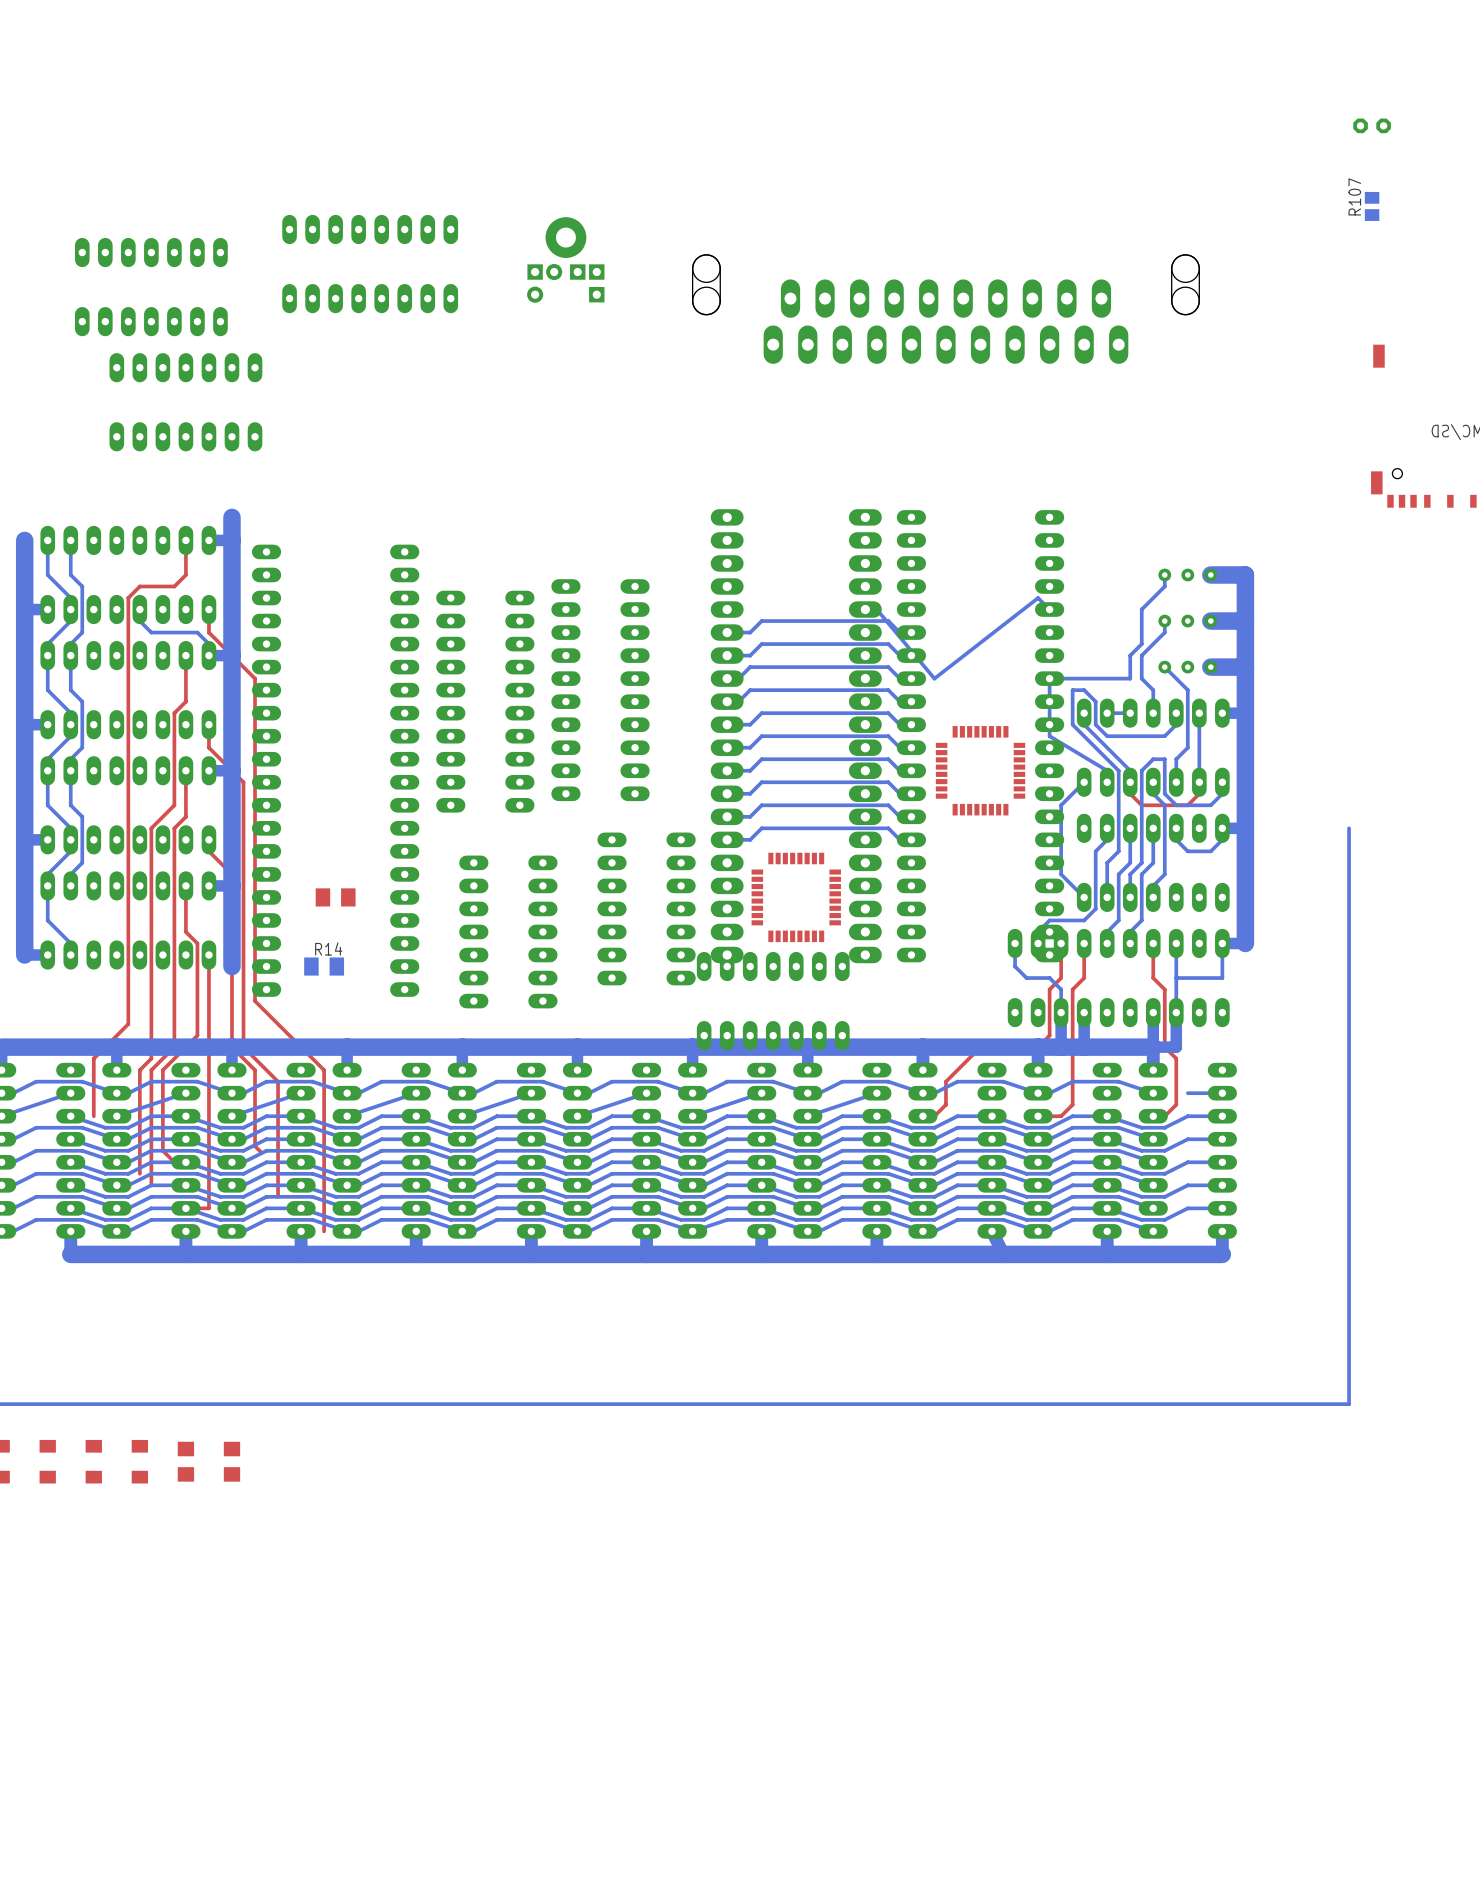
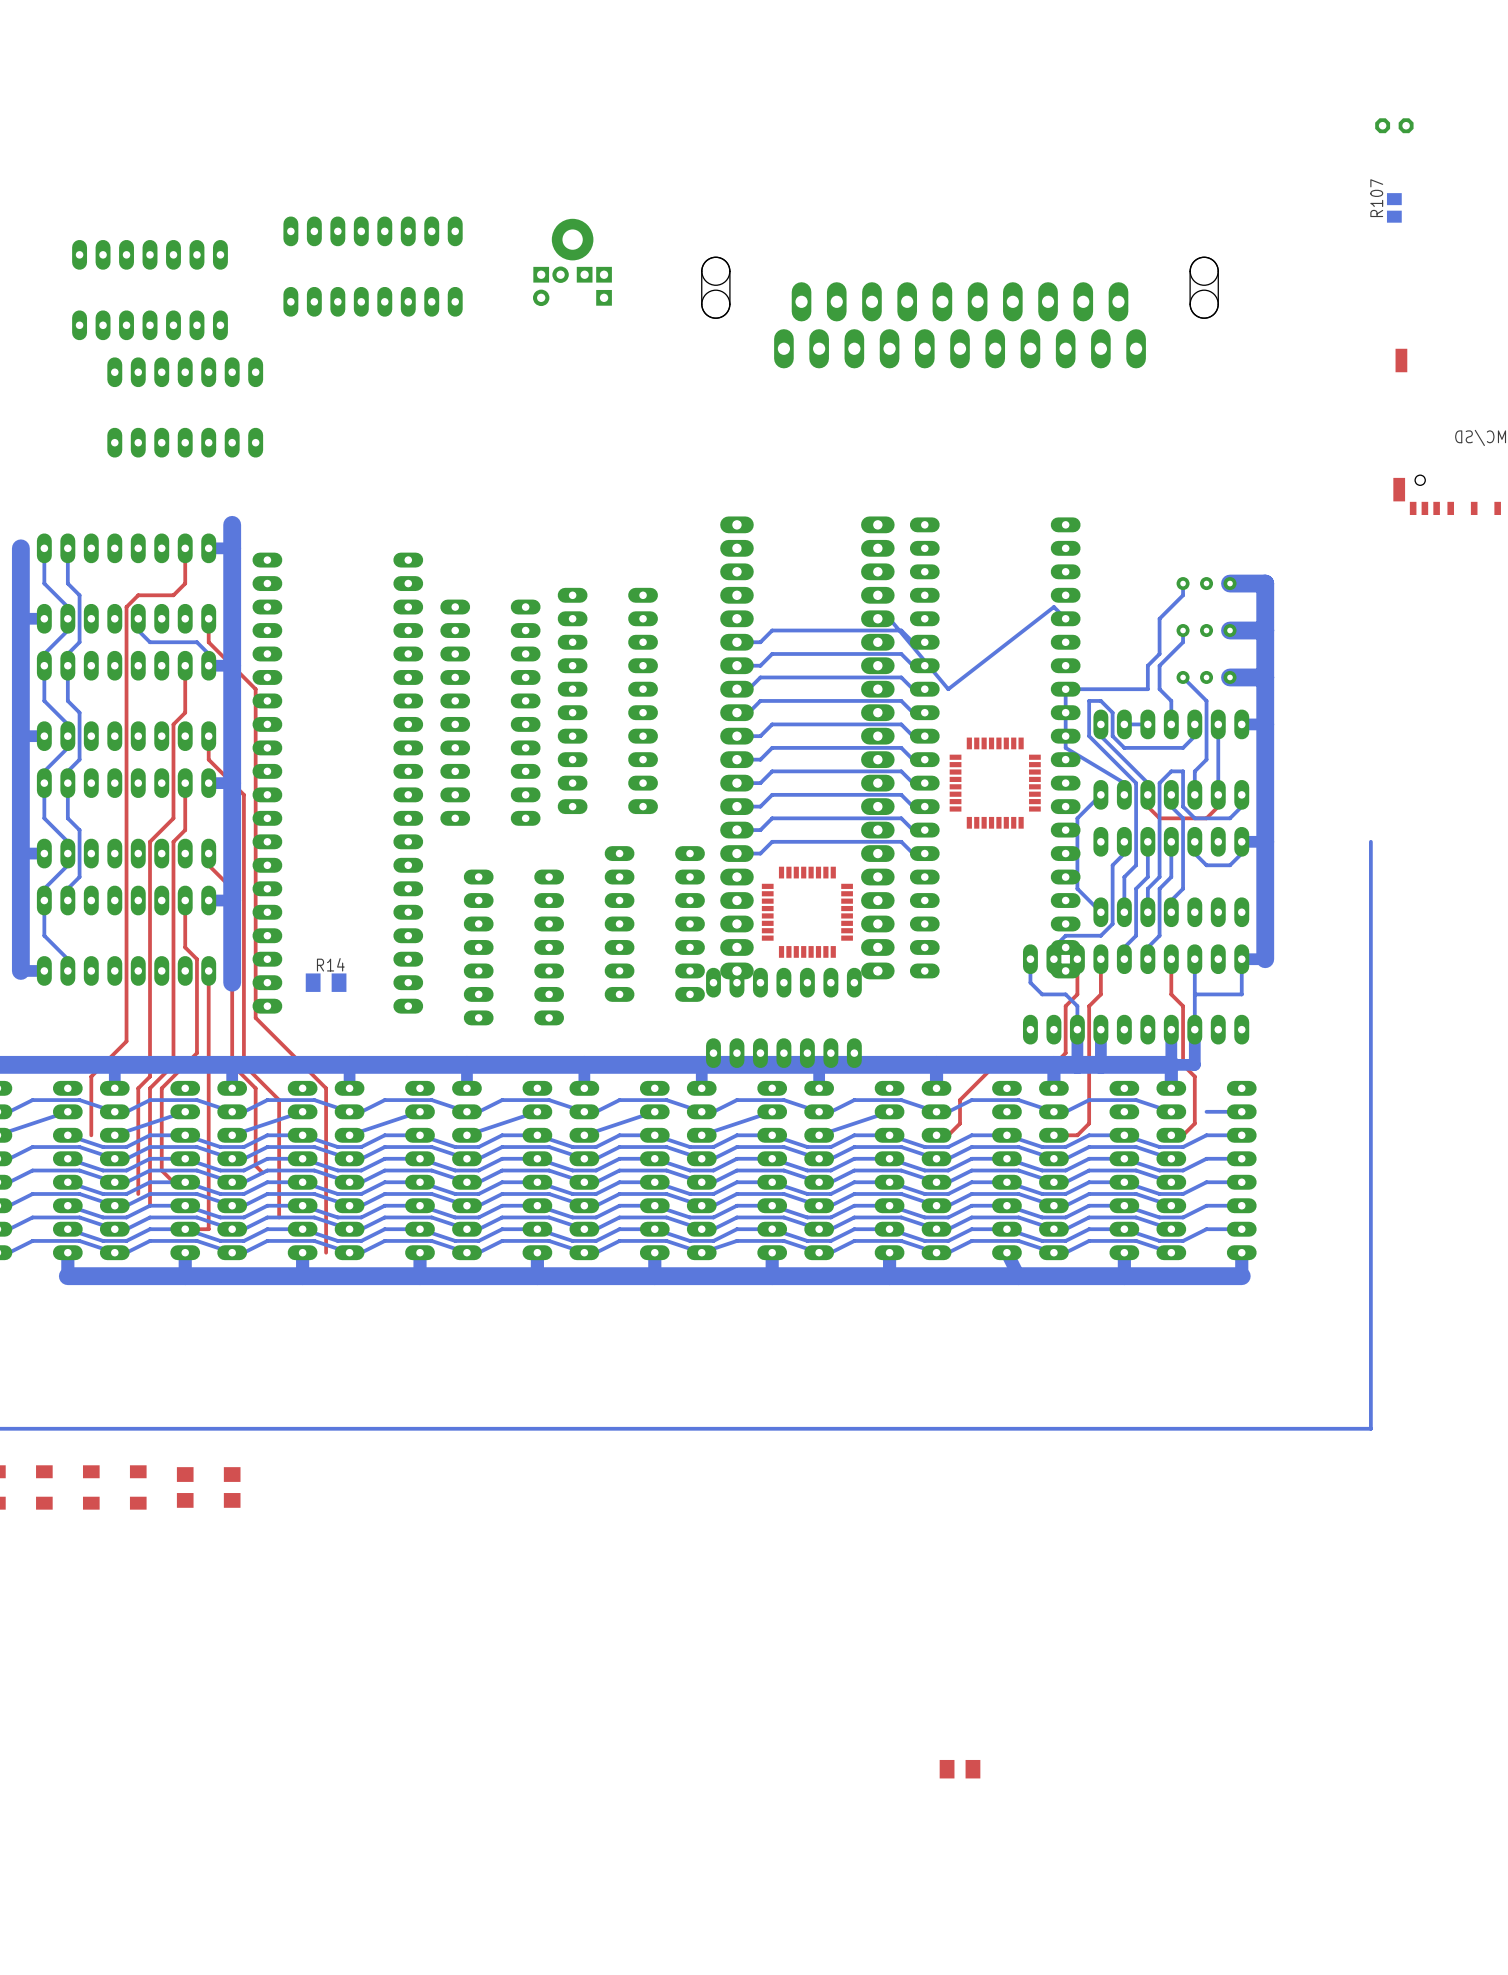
part: (335, 897) -> none
part: none -> (960, 1769)

